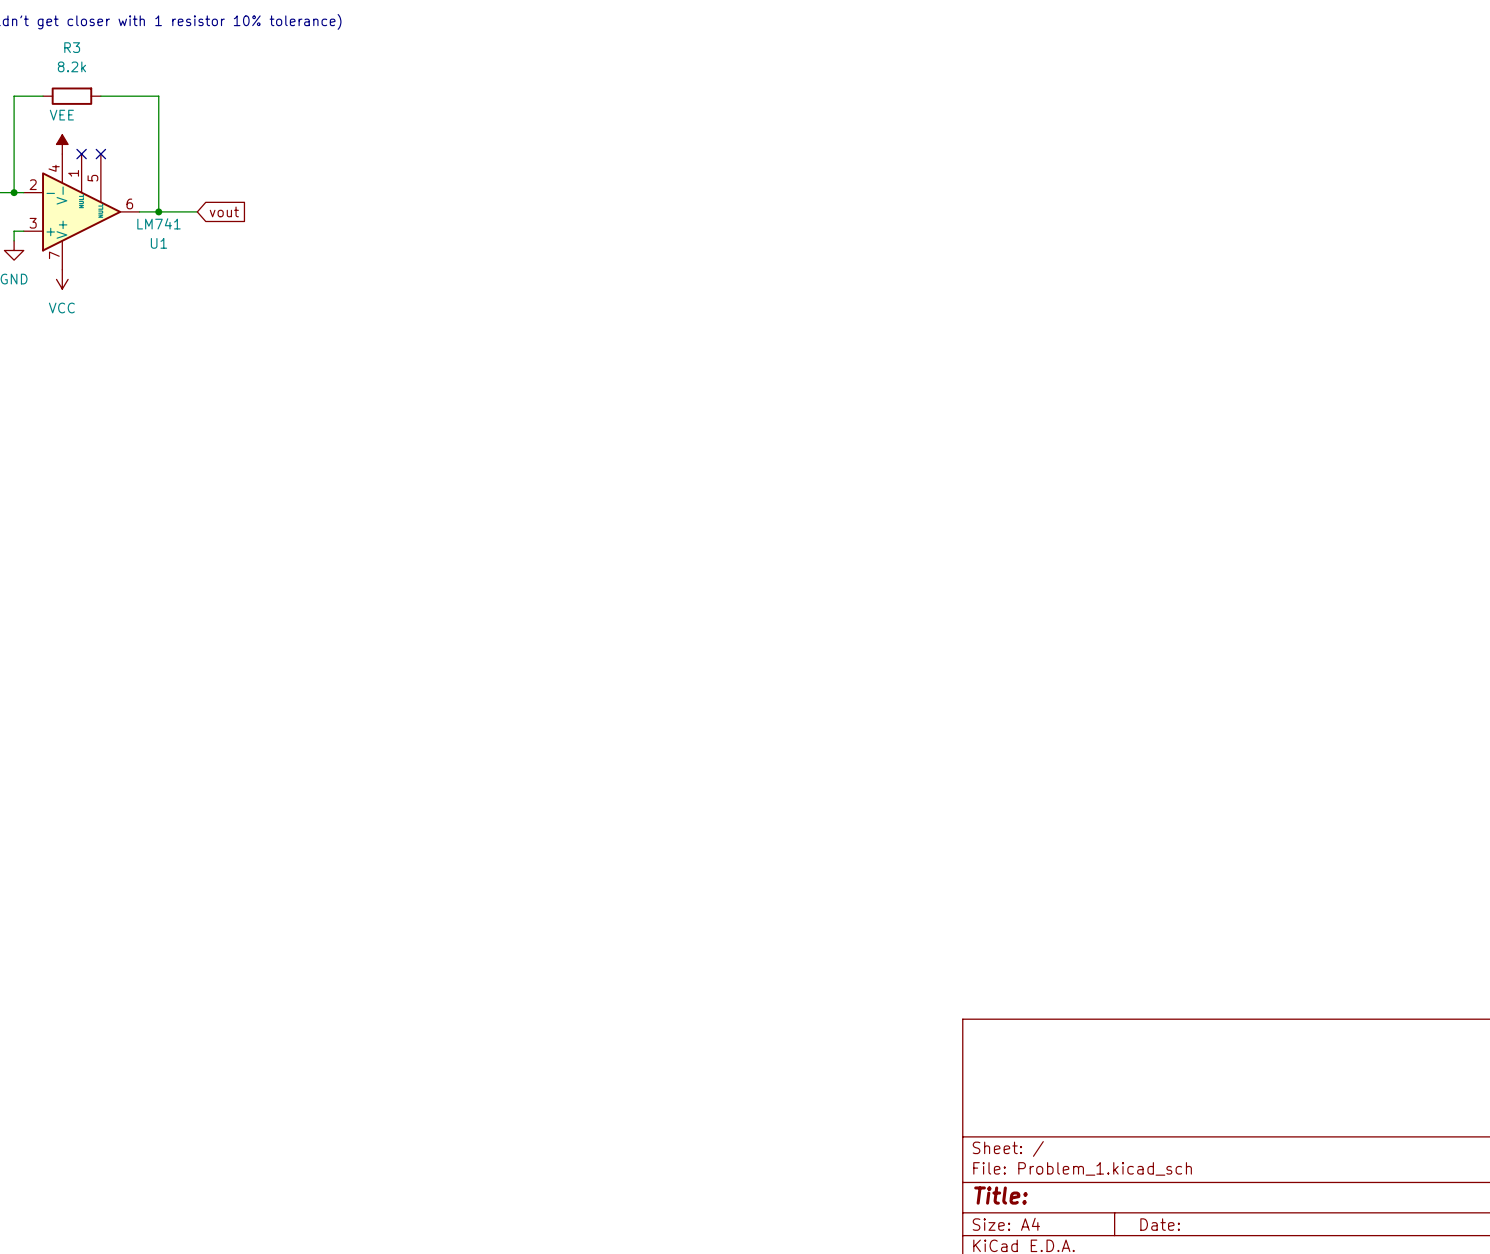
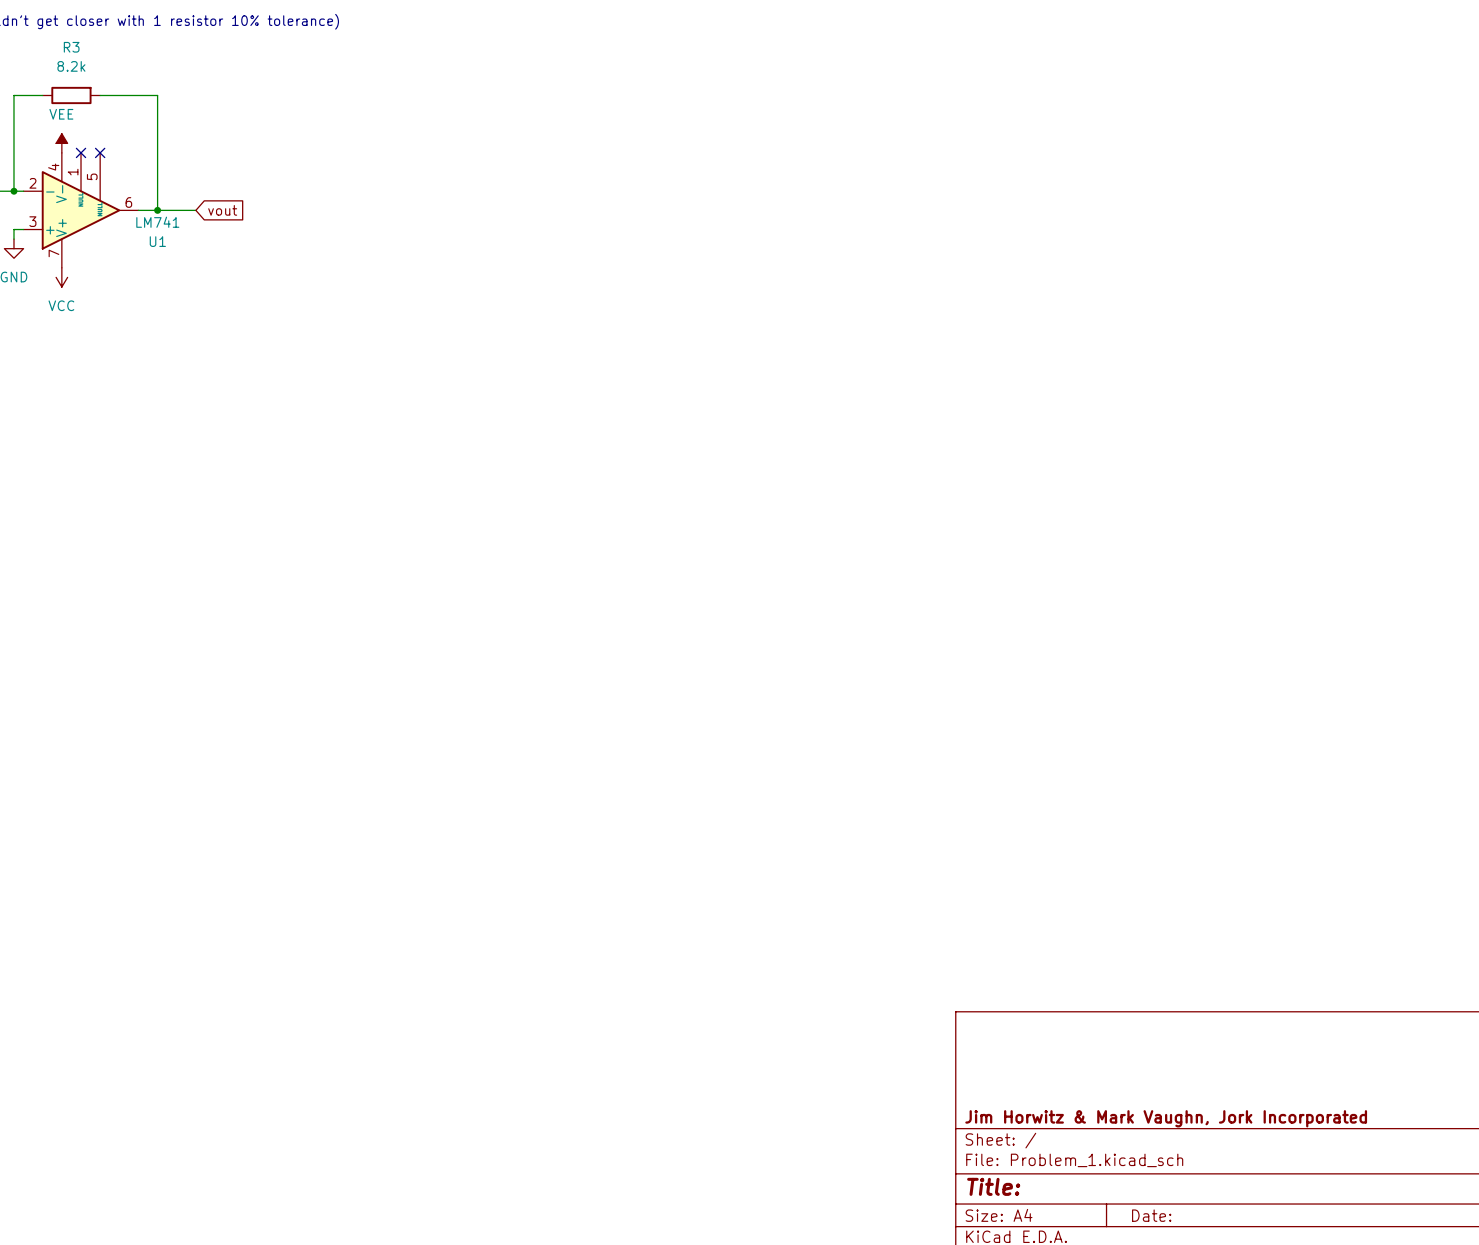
title block: none -> Jim Horwitz & Mark Vaughn, Jork Incorporated (1166, 1118)

